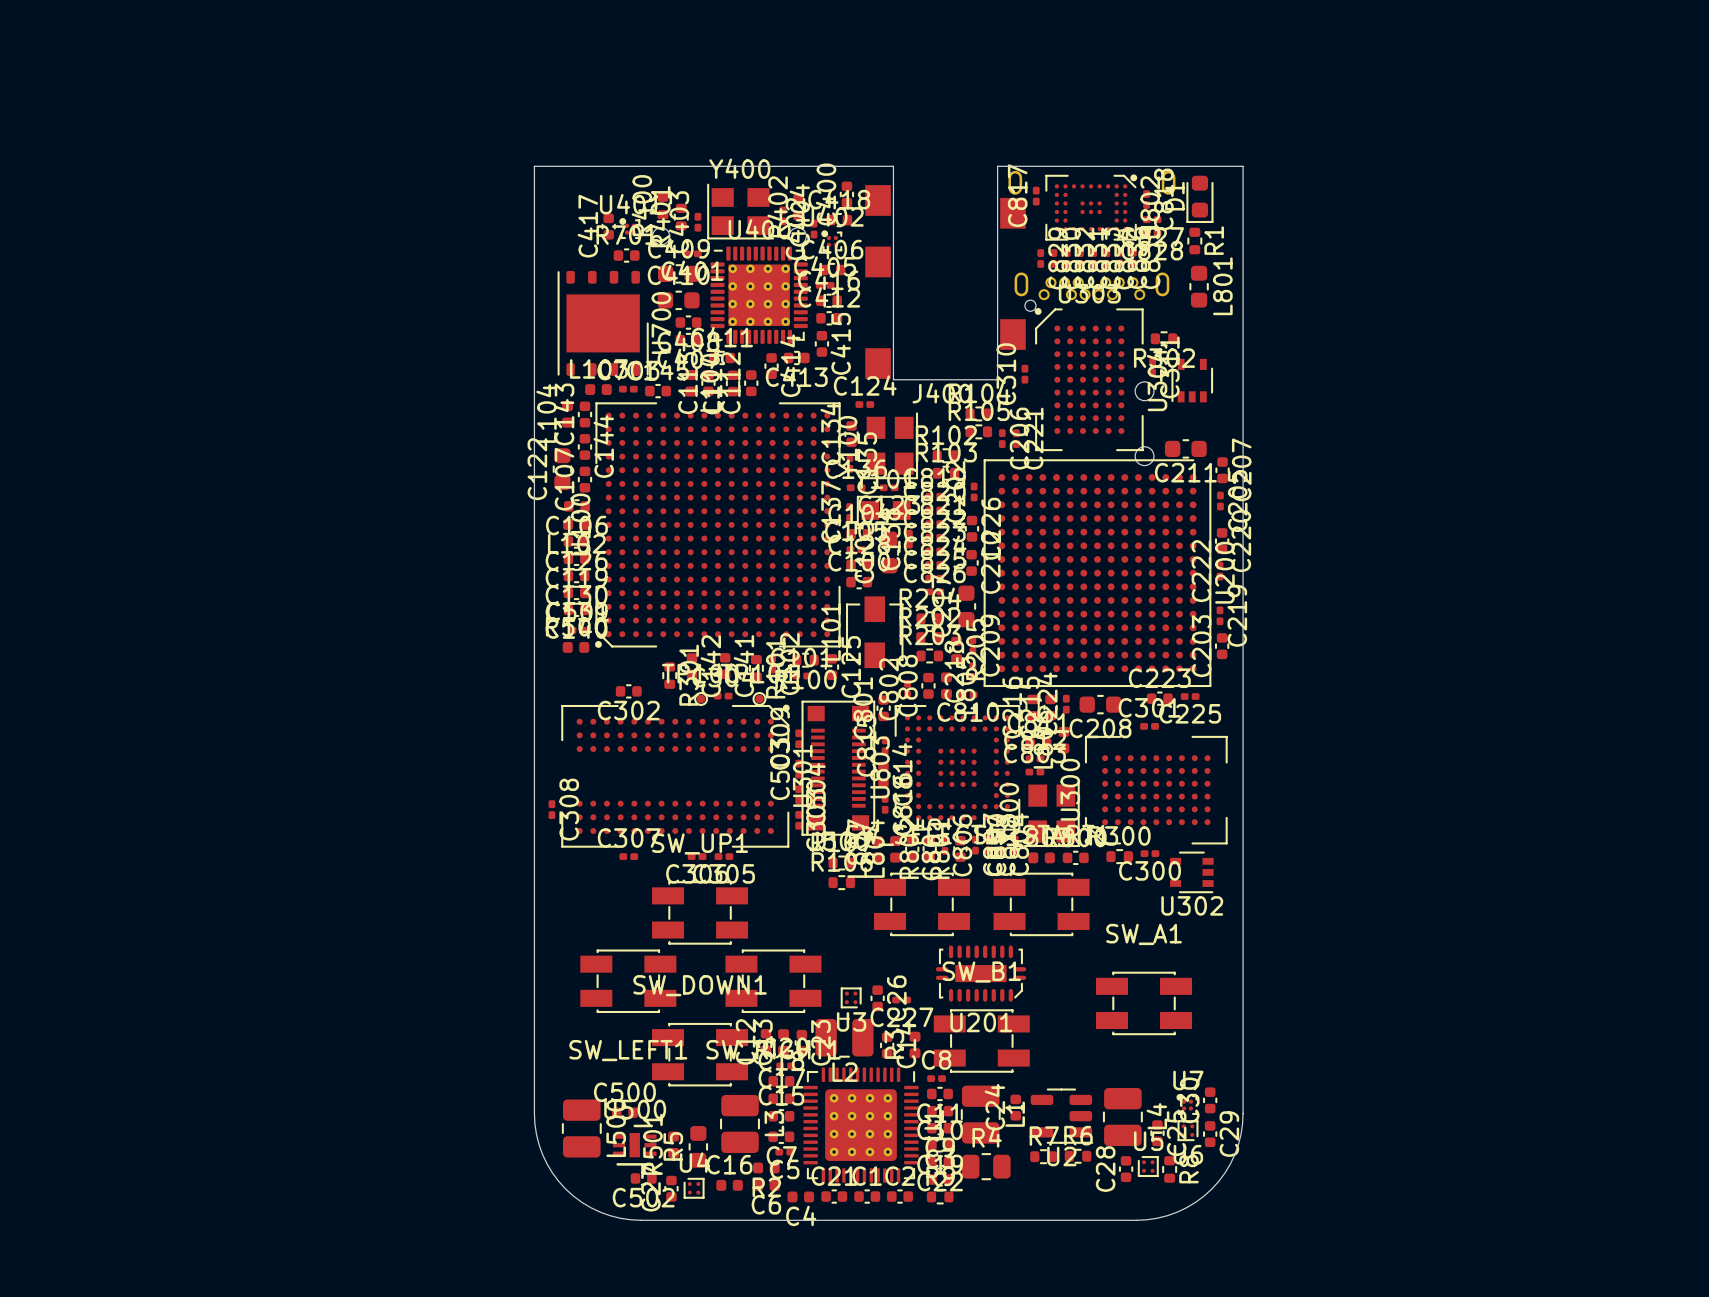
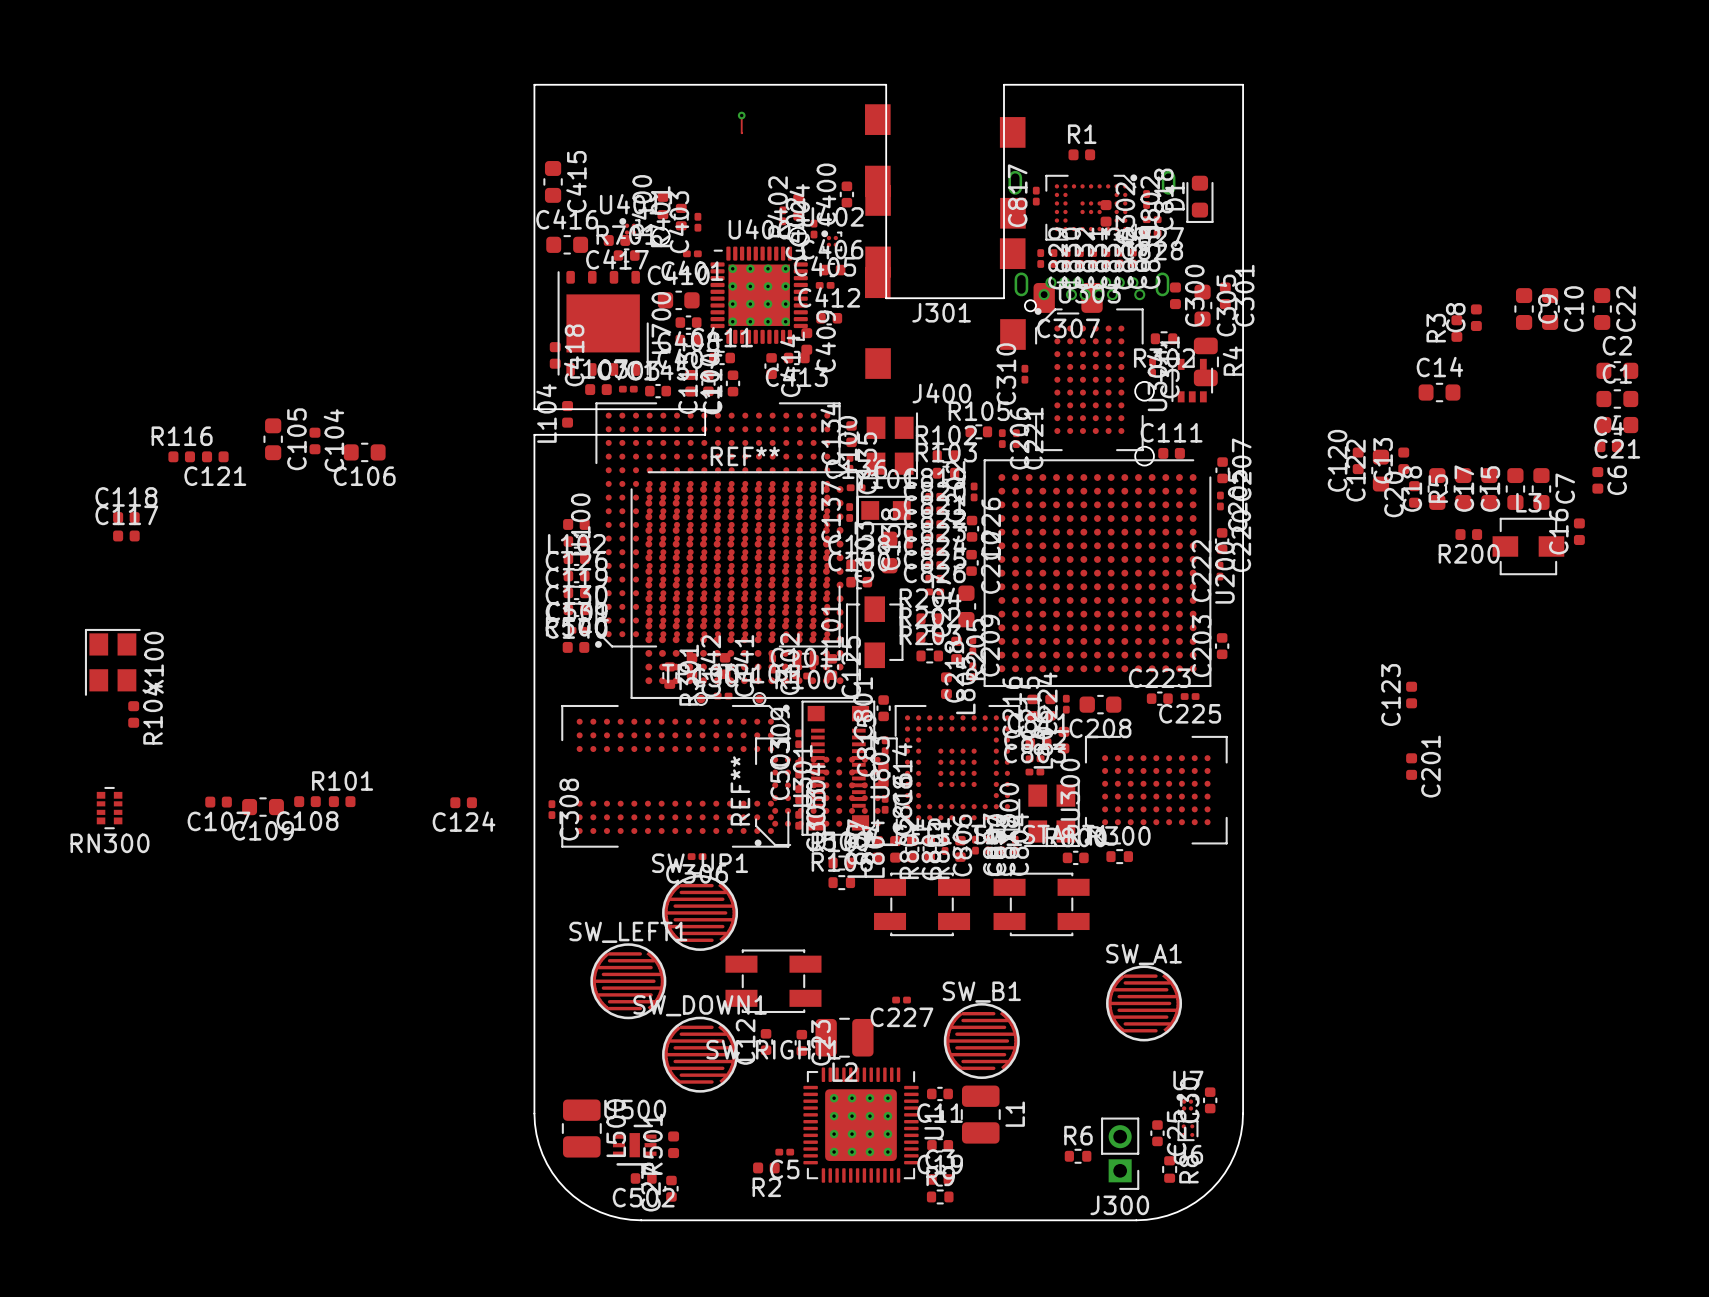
track: none -> (741, 115) (741, 133)
via: none -> (741, 115)
board edge: (534, 166) (893, 166) (893, 379) (997, 379) (997, 166) (1243, 166) -> (534, 166) (534, 84) (886, 84) (886, 298) (1004, 298) (1004, 84) (1243, 84) (1243, 166)
J301: none -> (945, 201)
Y400: (740, 211) -> none
C418 footprint: [826, 212, 853, 228] -> [549, 342, 561, 369]
C417 footprint: [601, 213, 616, 240] -> [603, 235, 631, 246]
R1 footprint: [1187, 227, 1203, 255] -> [1068, 149, 1096, 161]
C409 footprint: [658, 264, 700, 284] -> [801, 328, 813, 355]
L801: (1199, 286) -> none
C416 footprint: [816, 293, 842, 308] -> [546, 235, 589, 255]
C415 footprint: [814, 330, 830, 357] -> [543, 161, 563, 203]
C112: (751, 383) -> none
C124 name position: C124 (865, 385) -> C124 (464, 821)
C124 footprint: [855, 401, 875, 408] -> [450, 797, 477, 809]
R104 footprint: [965, 406, 993, 422] -> [128, 701, 140, 728]
board edge: (534, 409) (534, 434) -> (534, 409) (705, 409) (705, 434) (534, 434)
C143: (584, 414) -> none
C144: (584, 446) -> none
C211: (1185, 448) -> none
C111: none -> (1171, 453)
R116: none -> (181, 456)
C121: none -> (215, 456)
C120: none -> (1358, 460)
C107 footprint: [577, 466, 593, 493] -> [205, 796, 232, 808]
C122 position: (562, 469) -> (1380, 470)
C123 footprint: [879, 484, 899, 492] -> [1406, 681, 1418, 709]
C106 footprint: [563, 499, 590, 514] -> [343, 442, 386, 463]
C118: none -> (126, 517)
C104 footprint: [846, 527, 873, 542] -> [309, 427, 321, 455]
R200: none -> (1468, 534)
C117: none -> (126, 535)
C105 footprint: [846, 546, 866, 554] -> [263, 418, 283, 461]
REF**: none -> (744, 585)
C219: (1220, 615) -> none
R101 footprint: [748, 655, 764, 682] -> [328, 796, 356, 808]
X100: none -> (112, 662)
C302 footprint: [615, 684, 642, 699] -> [1100, 200, 1112, 227]
C808: (928, 685) -> none
C802: (907, 689) -> none
C810: (968, 694) -> none
C301 footprint: [1140, 722, 1159, 730] -> [1219, 282, 1231, 310]
C201: none -> (1411, 766)
REF**: none -> (826, 791)
C108: none -> (307, 801)
C109: none -> (263, 807)
RN300: none -> (109, 808)
C307 name position: C307 (629, 838) -> C307 (1068, 328)
C300 footprint: [1140, 850, 1160, 858] -> [1169, 282, 1181, 310]
C307 footprint: [619, 853, 639, 861] -> [1033, 281, 1103, 315]
C305 footprint: [714, 853, 734, 861] -> [1192, 284, 1213, 327]
part: (1041, 857) -> none
U302: (1191, 872) -> none
SW_UP1 footprint: [652, 881, 749, 945] -> [662, 874, 739, 951]
SW_LEFT1 footprint: [580, 949, 677, 1014] -> [590, 943, 667, 1020]
SW_A1 footprint: [1095, 971, 1193, 1036] -> [1106, 965, 1183, 1042]
U201: (980, 973) -> none
U3: (851, 997) -> none
C26: (877, 998) -> none
SW_B1 footprint: [933, 1009, 1030, 1073] -> [943, 1003, 1020, 1080]
SW_DOWN1 footprint: [652, 1022, 749, 1087] -> [662, 1016, 739, 1093]
C14 footprint: [880, 1032, 895, 1059] -> [1418, 382, 1461, 403]
C13 position: (783, 1042) -> (1403, 460)
R3 position: (915, 1044) -> (1456, 328)
SW_LEFT1 name position: SW_LEFT1 (628, 1050) -> SW_LEFT1 (628, 932)
C20 footprint: [776, 1062, 796, 1070] -> [1409, 481, 1421, 508]
C18 footprint: [768, 1074, 795, 1089] -> [1427, 468, 1448, 510]
C8 footprint: [927, 1075, 946, 1082] -> [1470, 304, 1482, 332]
C17 footprint: [768, 1091, 795, 1106] -> [1479, 468, 1500, 510]
L3 footprint: [720, 1094, 760, 1153] -> [1492, 517, 1565, 576]
C10 footprint: [927, 1103, 954, 1119] -> [1540, 288, 1560, 330]
C24: (1015, 1107) -> none
C15 footprint: [768, 1109, 795, 1124] -> [1505, 468, 1526, 510]
C500: (624, 1112) -> none
U2: (1061, 1116) -> none
L4: (1122, 1117) -> none
C9 footprint: [927, 1121, 954, 1136] -> [1514, 288, 1534, 330]
L3 name position: L3 (774, 1123) -> L3 (1528, 502)
C7 footprint: [768, 1129, 795, 1144] -> [1531, 468, 1552, 510]
C29: (1210, 1134) -> none
R4 name position: R4 (987, 1137) -> R4 (1232, 361)
R5 position: (698, 1146) -> (1463, 489)
R4 footprint: [961, 1153, 1011, 1181] -> [1192, 337, 1219, 387]
J300: none -> (1120, 1153)
C22 footprint: [927, 1155, 954, 1170] -> [1592, 288, 1612, 330]
R7: (1043, 1156) -> none
U5: (1148, 1166) -> none
C28: (1126, 1169) -> none
C21 name position: C21 (834, 1176) -> C21 (1617, 448)
C16 rotation: 0° (729, 1185) -> 90° clockwise (1579, 531)
C16 position: (729, 1185) -> (1579, 531)
C6 rotation: 0° (766, 1185) -> 90° clockwise (1597, 480)
C6 position: (766, 1185) -> (1597, 480)
U4: (694, 1188) -> none
C21 footprint: [821, 1189, 848, 1204] -> [1596, 415, 1639, 435]
C1 footprint: [854, 1189, 881, 1204] -> [1596, 389, 1639, 409]
C2 footprint: [887, 1189, 913, 1204] -> [1596, 361, 1639, 381]
C4 position: (800, 1196) -> (1608, 446)
C4 name position: C4 (801, 1215) -> C4 (1609, 425)

